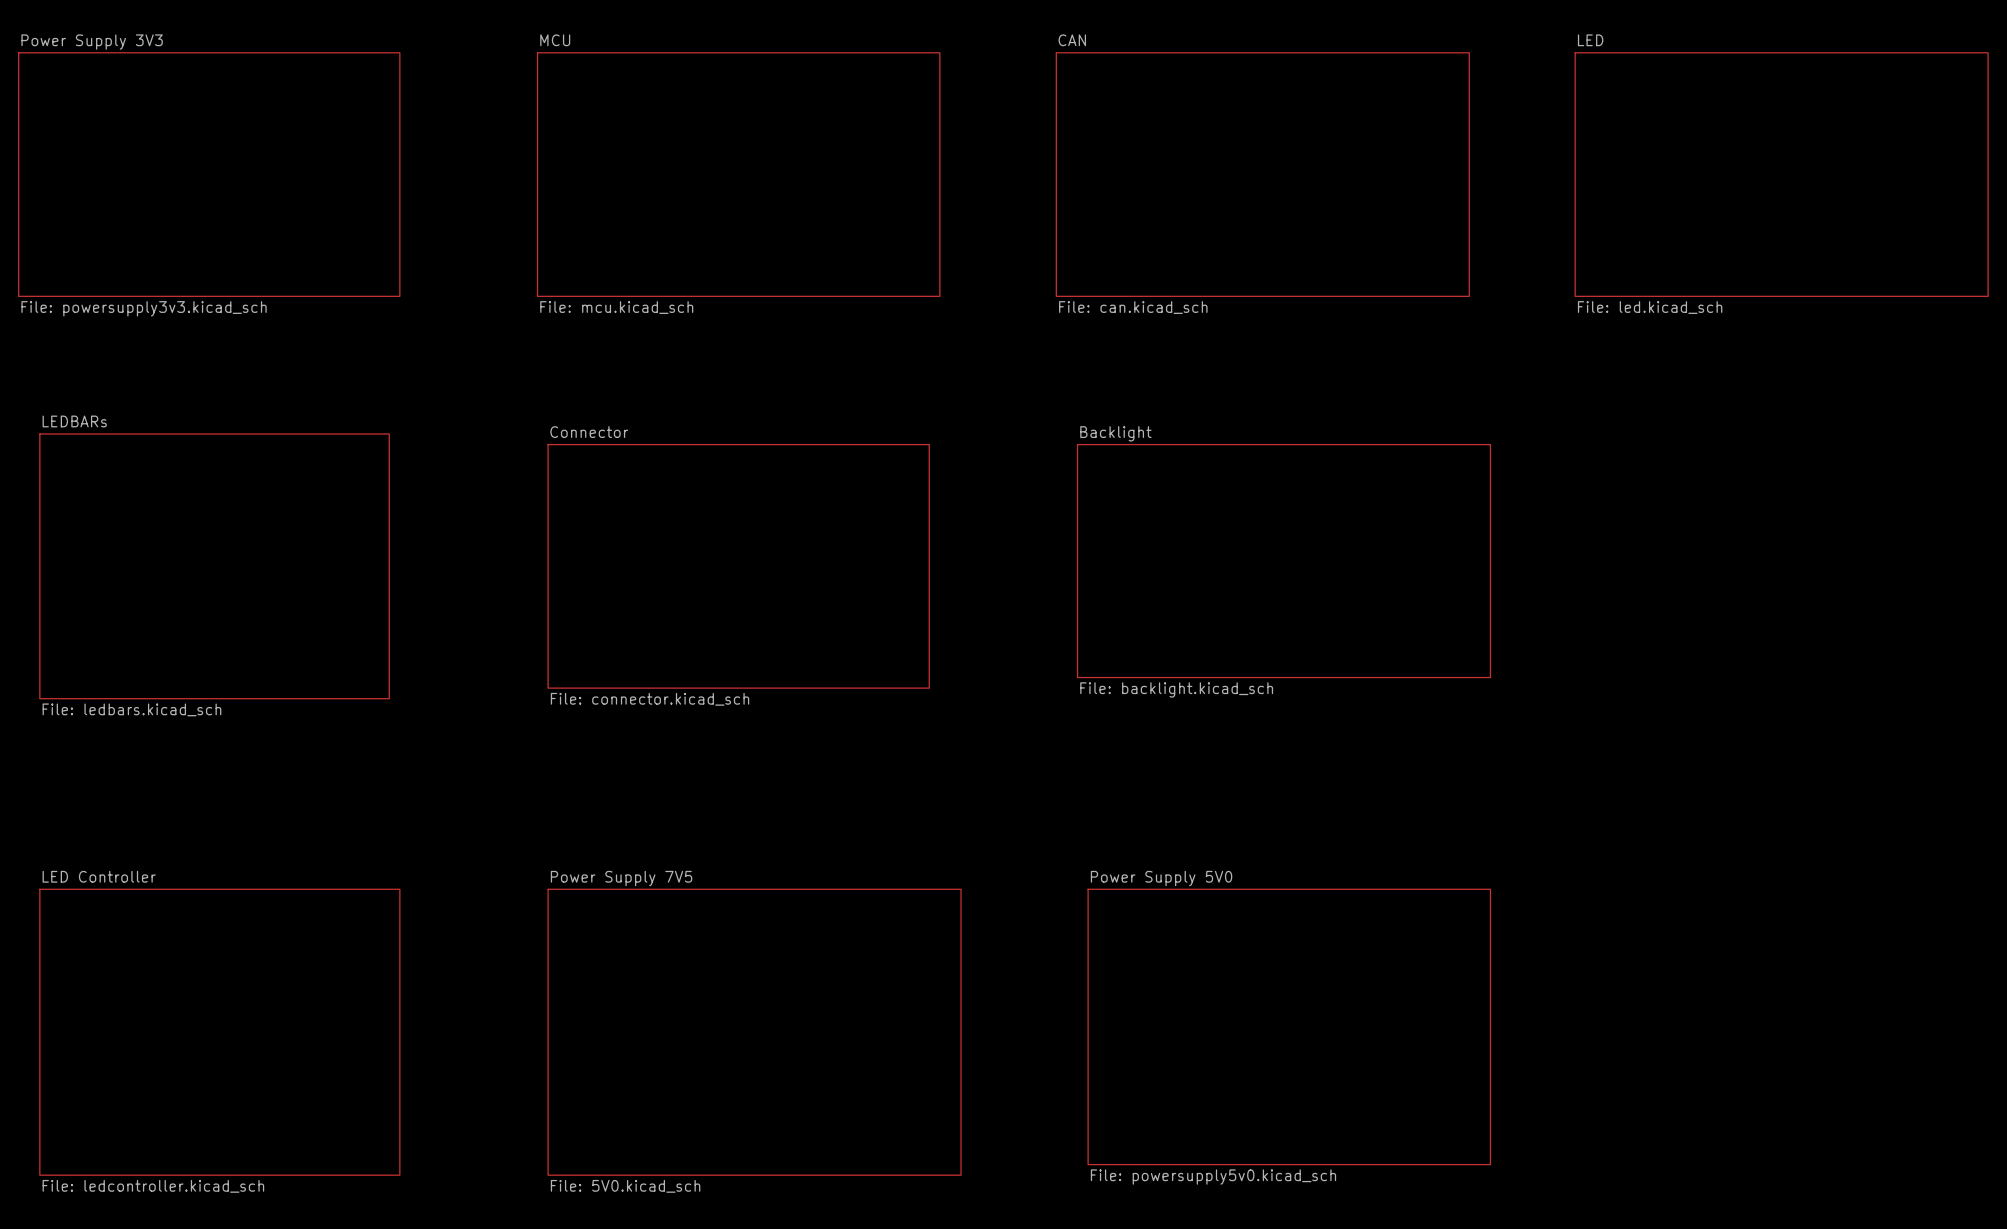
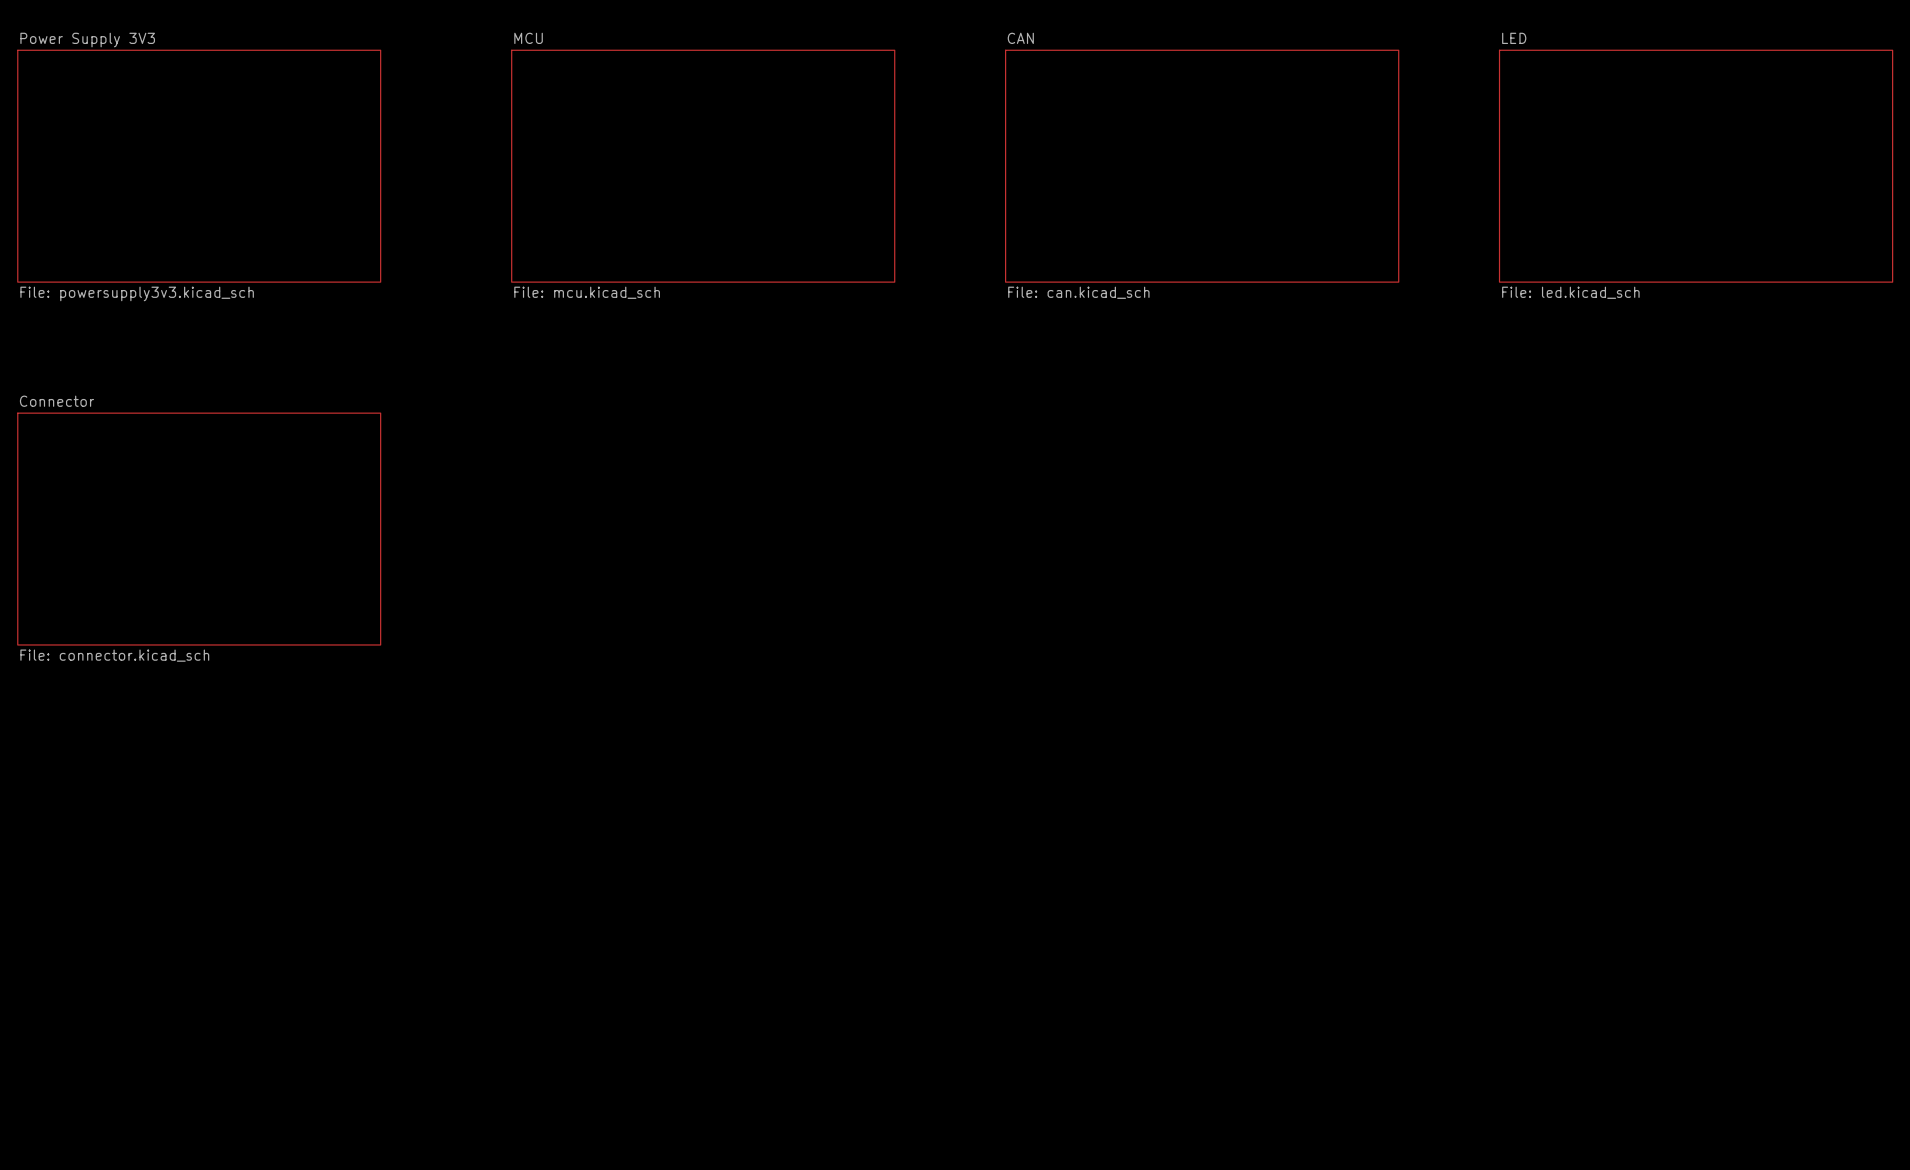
sheet Connector: none -> File: connector.kicad_sch (199, 529)
sheet Backlight: File: backlight.kicad_sch (1283, 561) -> none
sheet LEDBARs: File: ledbars.kicad_sch (214, 566) -> none
sheet Connector: File: connector.kicad_sch (738, 566) -> none
sheet Power Supply 5V0: File: powersupply5v0.kicad_sch (1289, 1026) -> none
sheet LED Controller: File: ledcontroller.kicad_sch (219, 1032) -> none
sheet Power Supply 7V5: File: 5V0.kicad_sch (754, 1032) -> none

